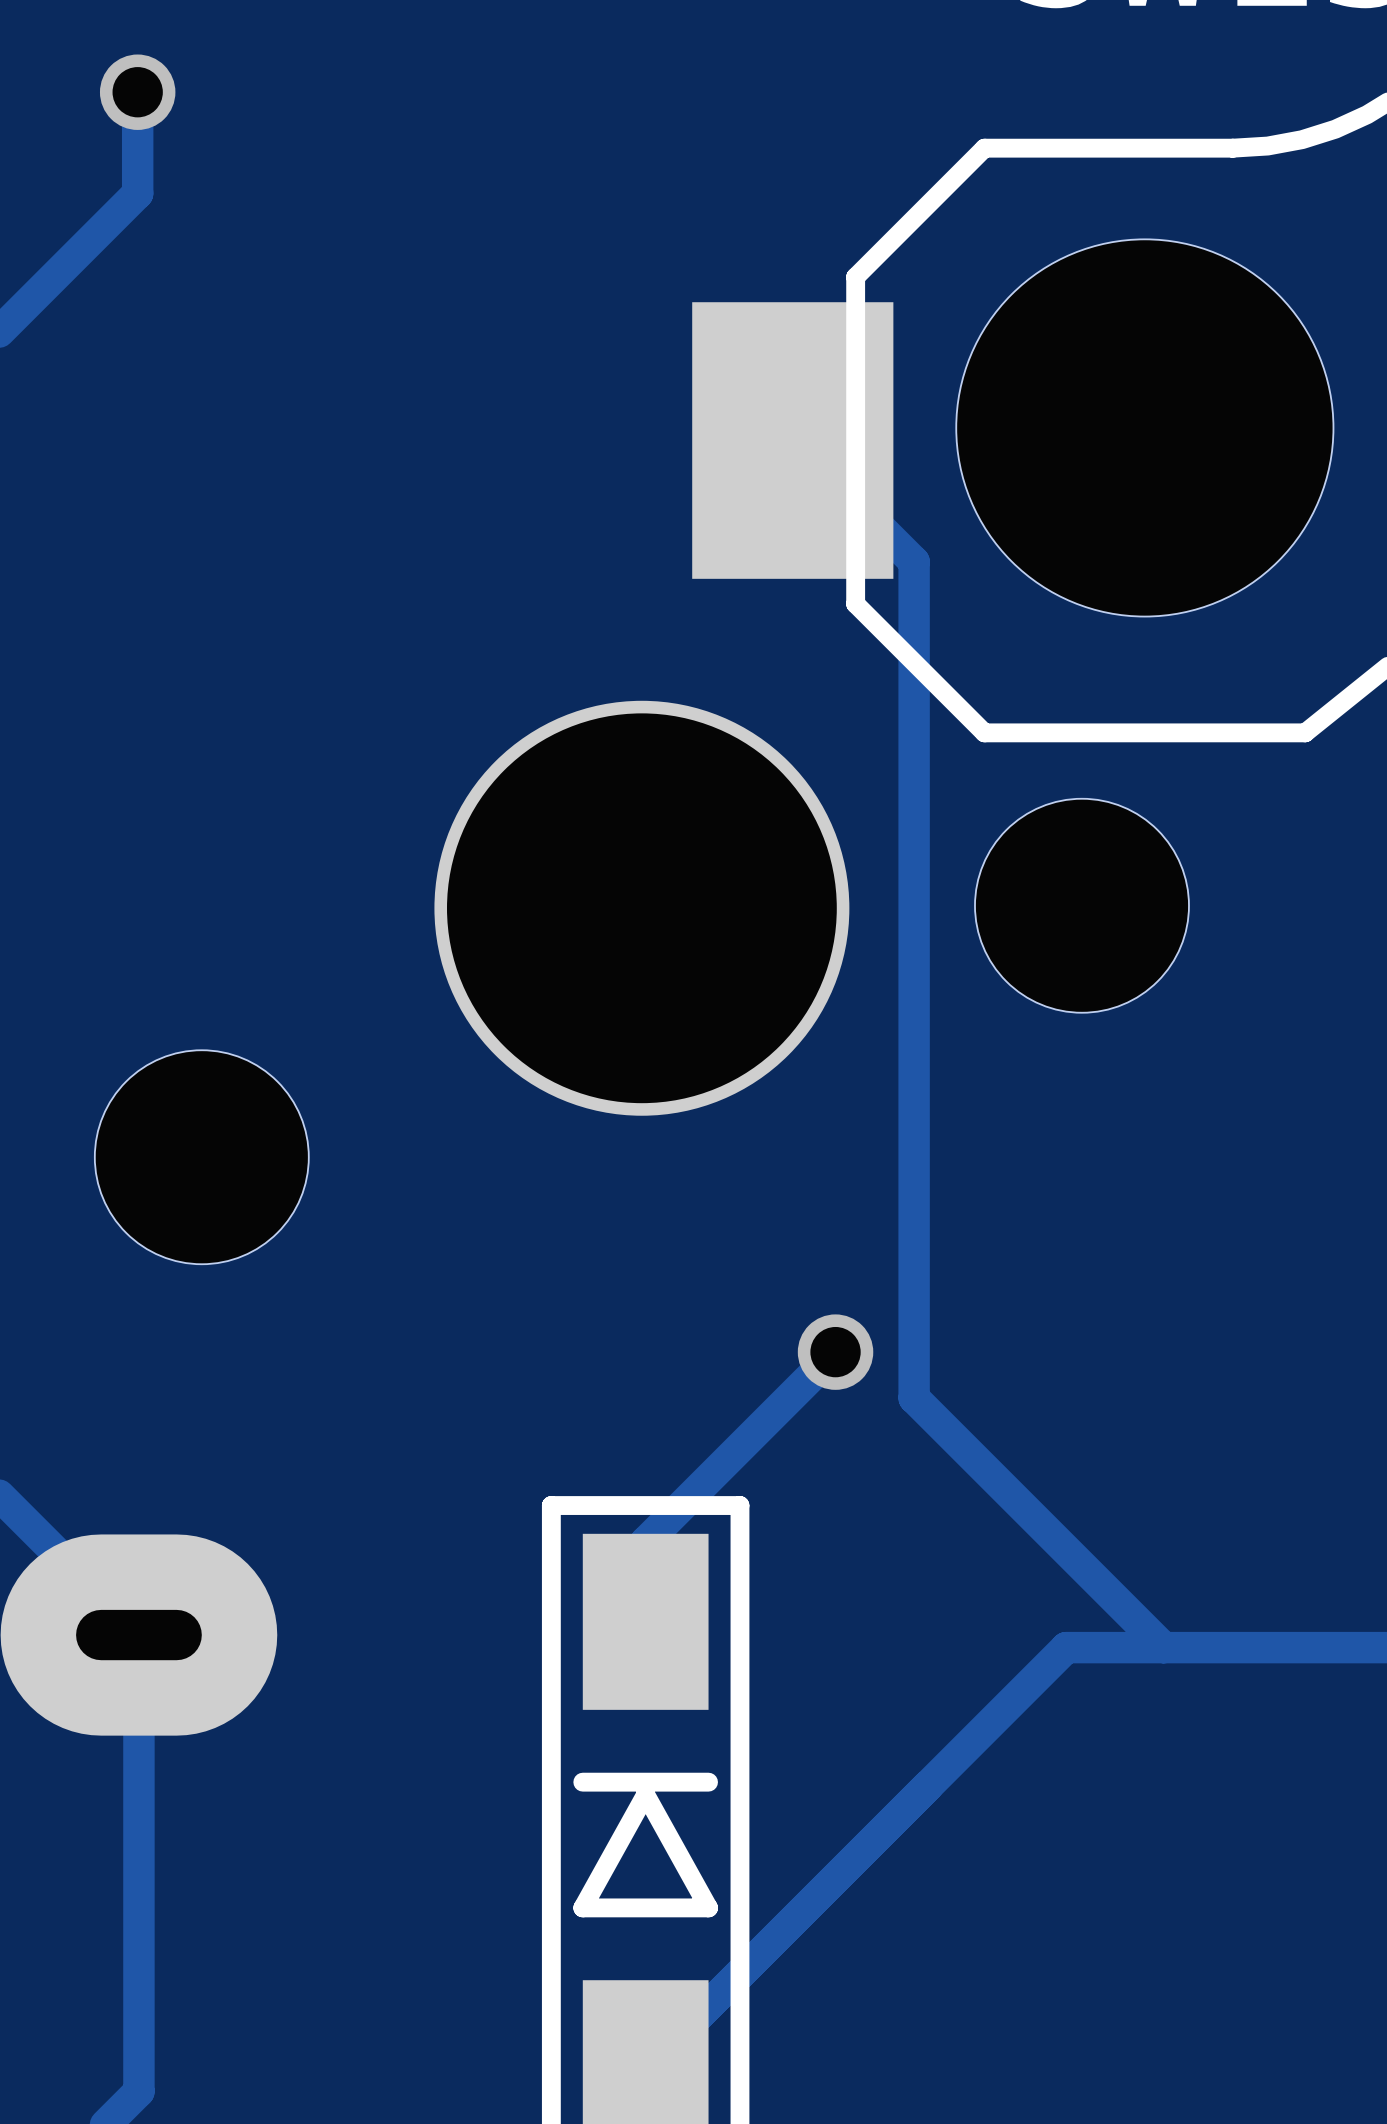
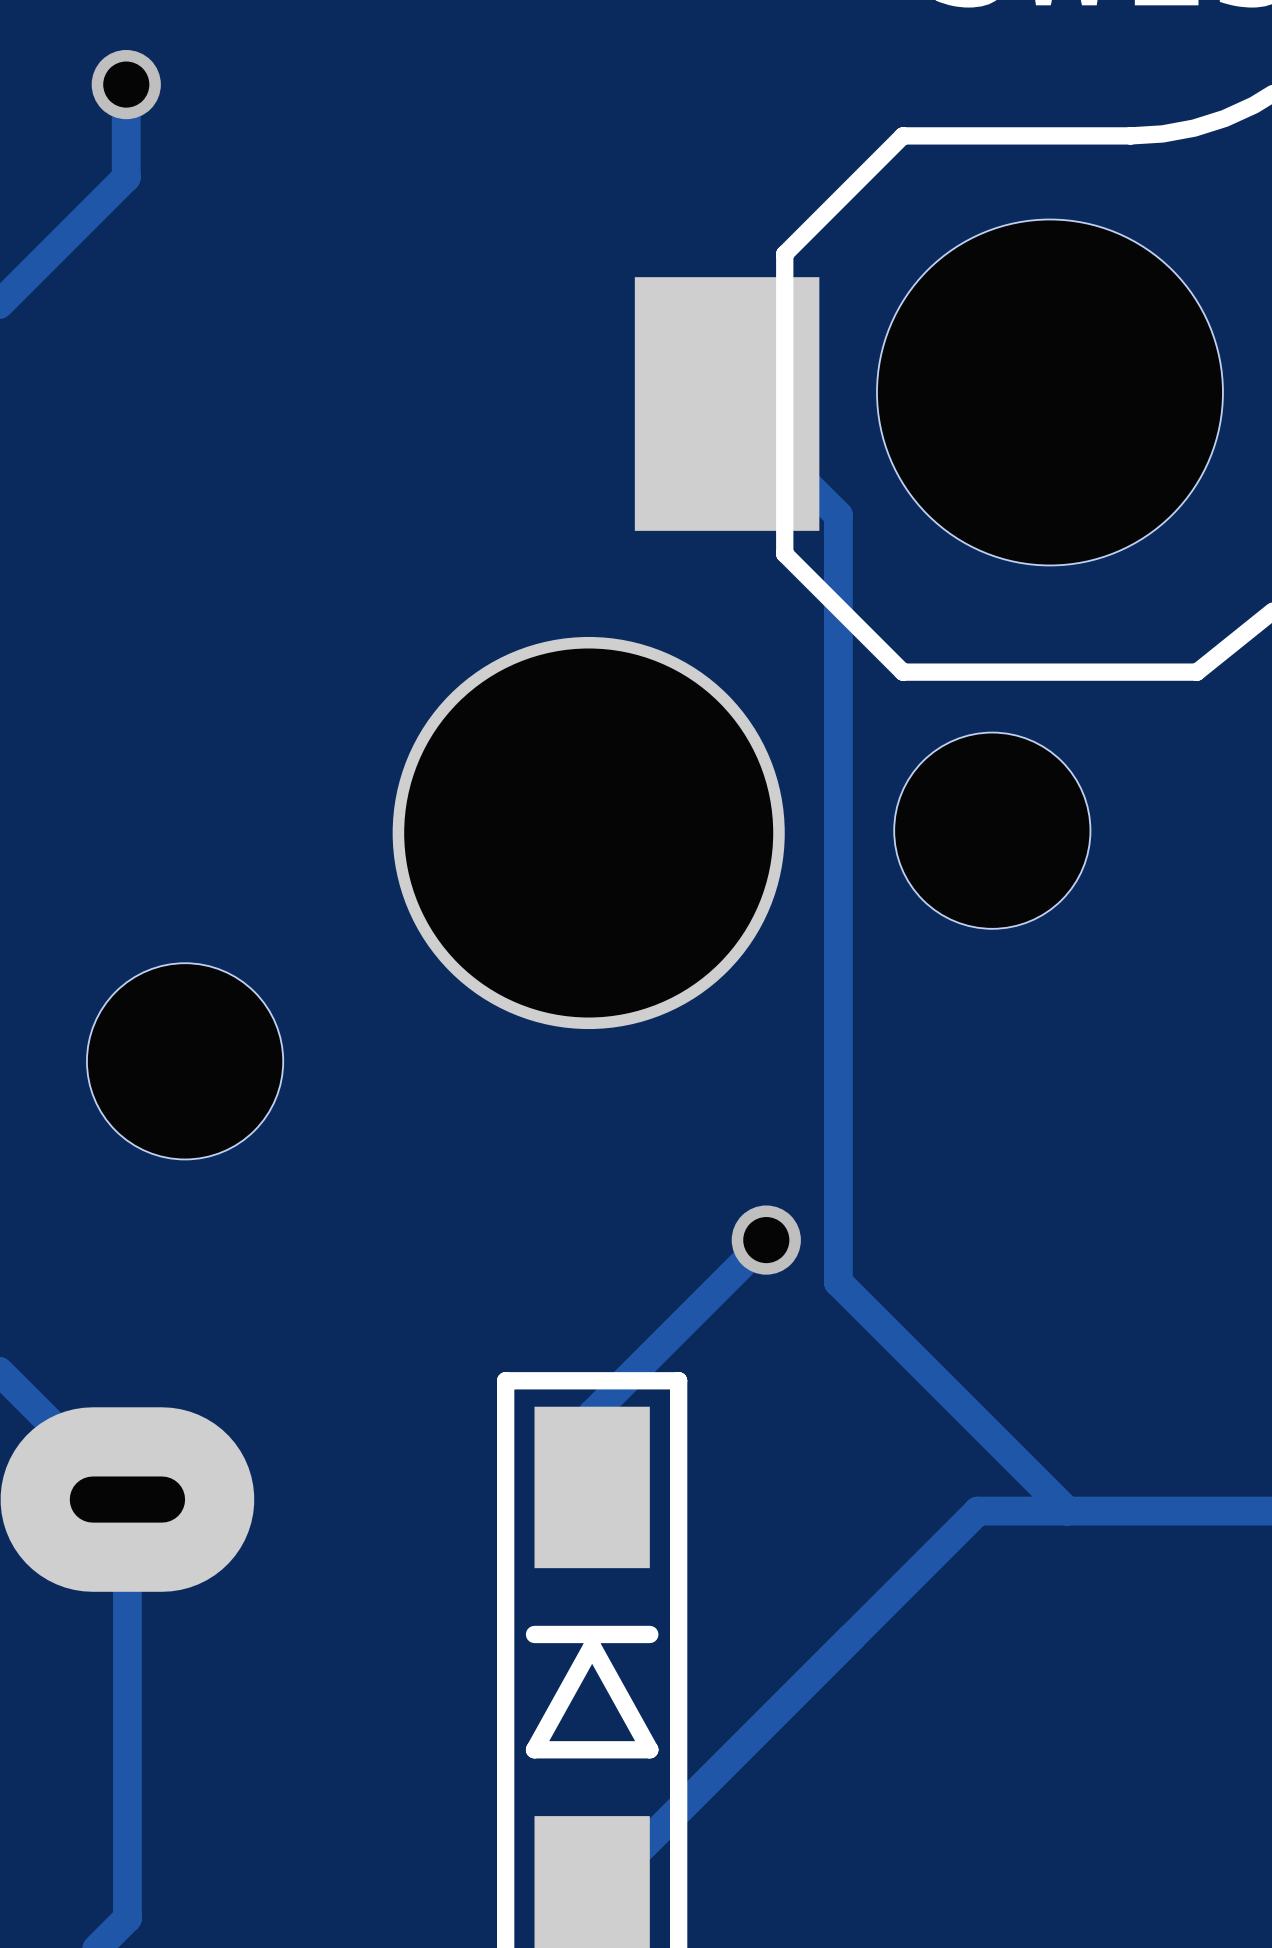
part footprint: [434, 700, 850, 1116] -> [392, 636, 785, 1030]

